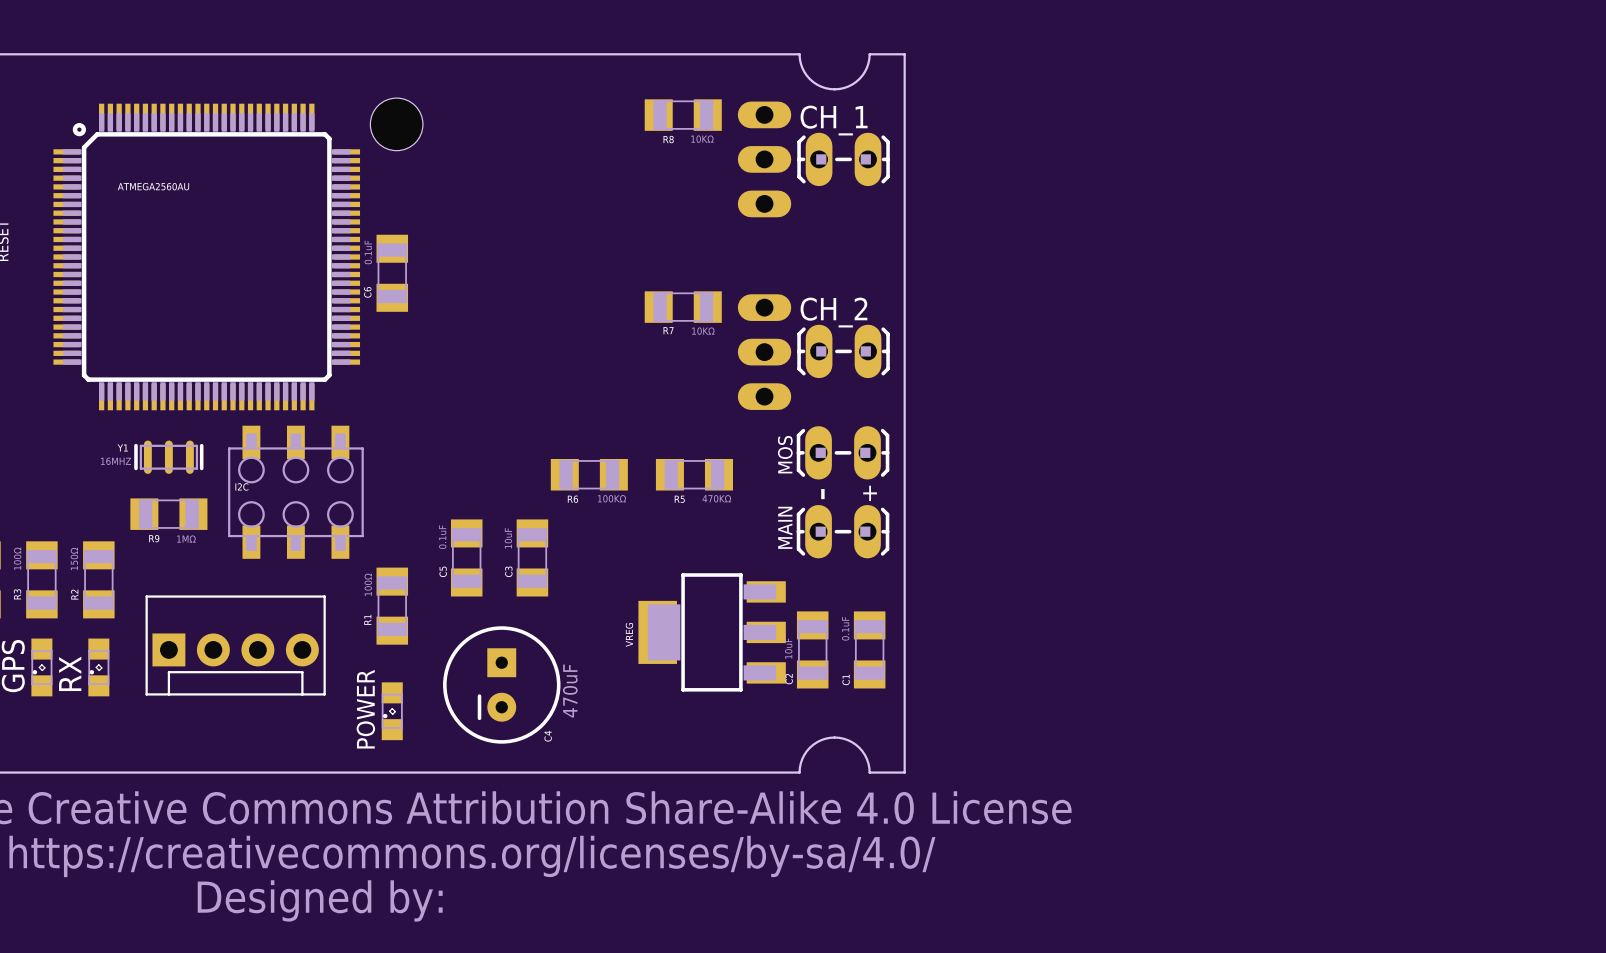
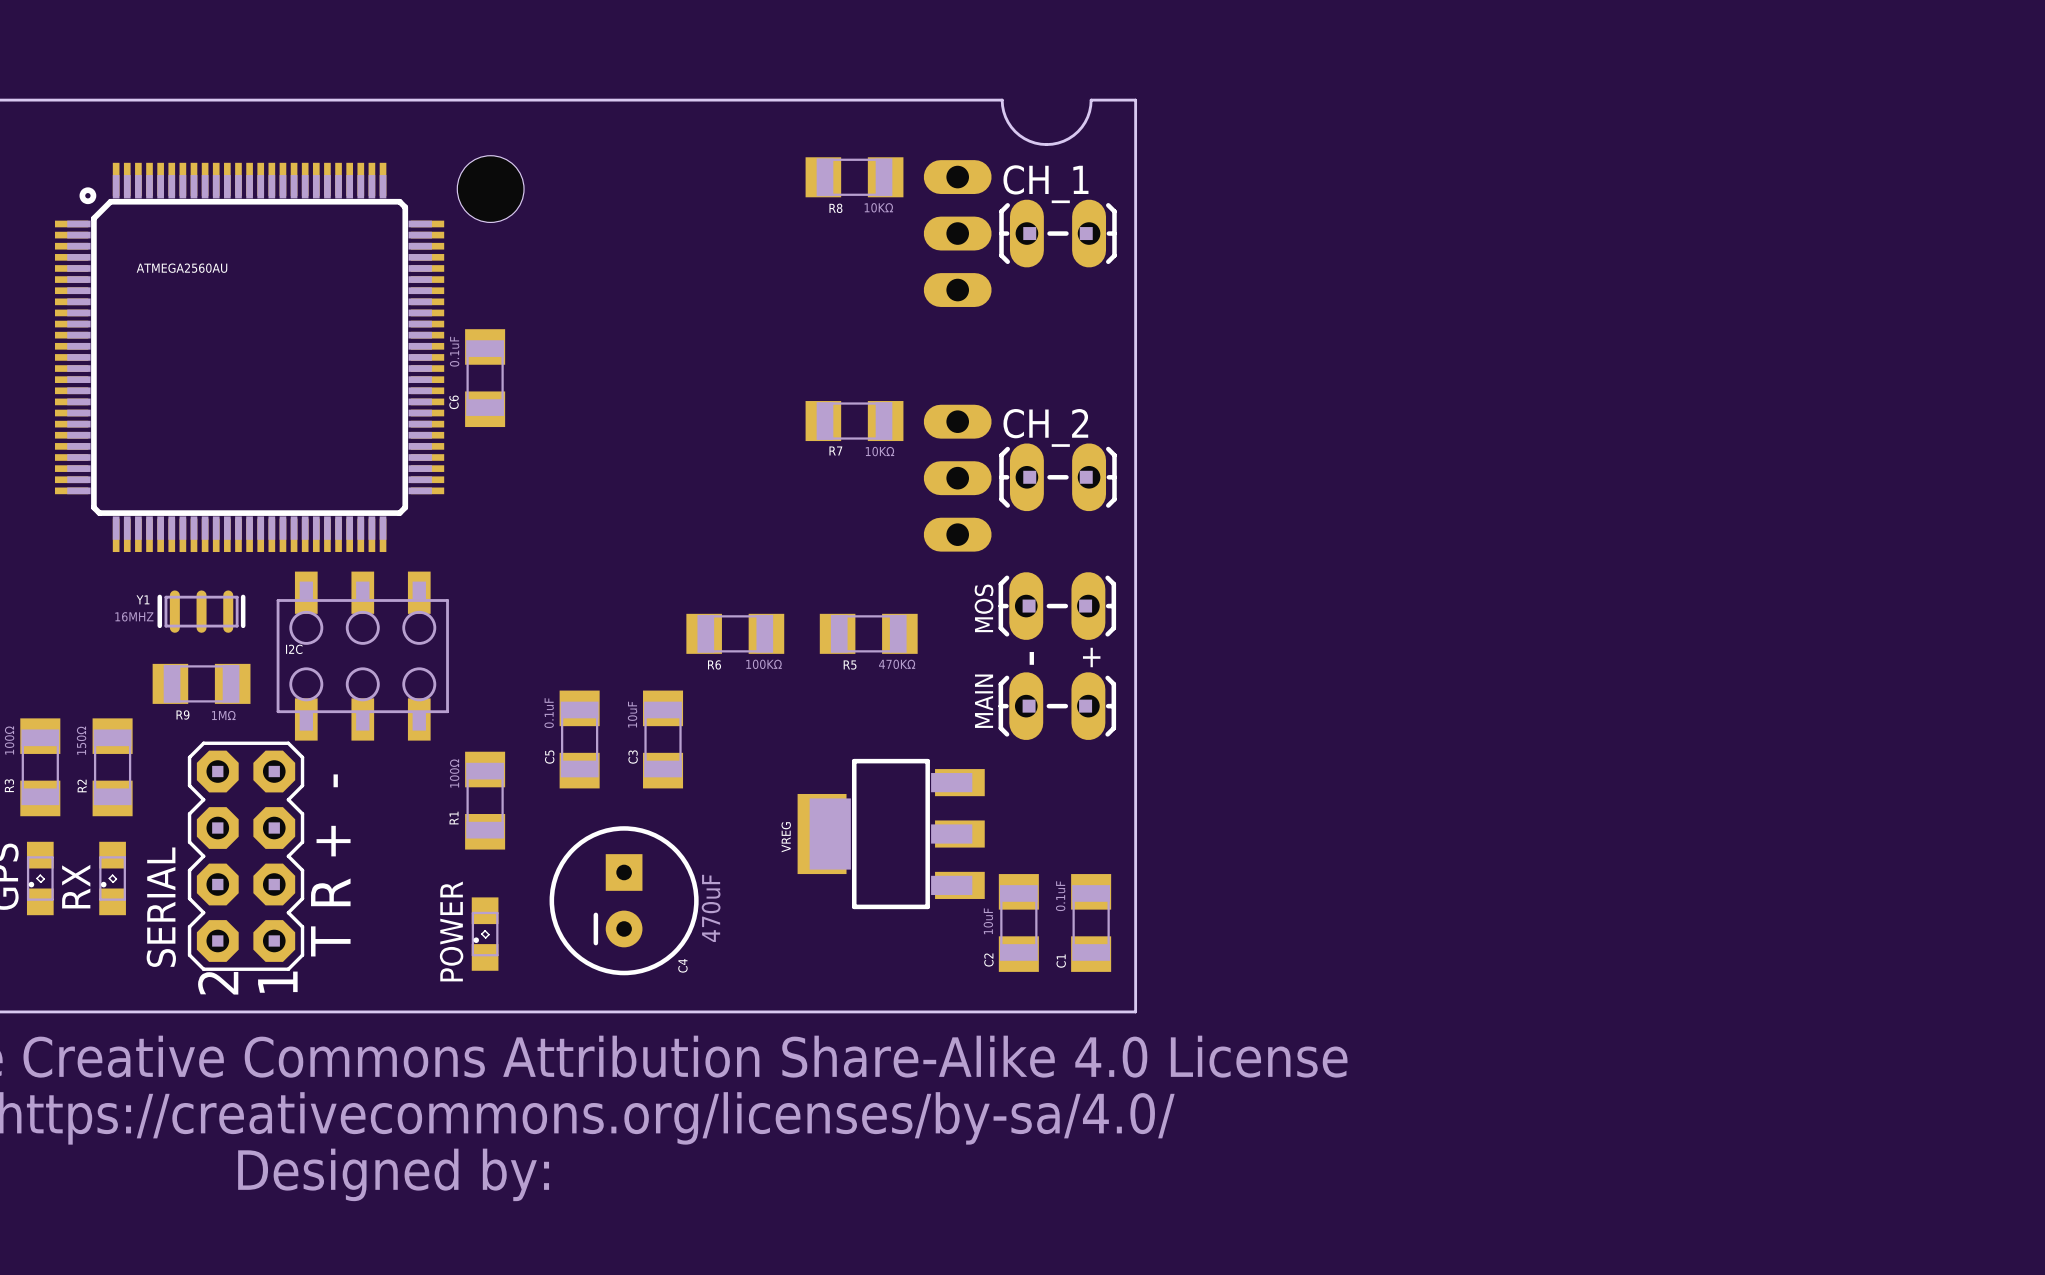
part: (235, 645) -> none
SERIAL: none -> (246, 856)
C2 position: (812, 649) -> (1018, 922)
C1 position: (869, 649) -> (1091, 922)
text: none -> T R + - (330, 865)
text: none -> 2 (218, 983)
text: none -> 1 (277, 982)
board edge: (799, 772) (802, 759) (809, 747) (821, 740) (834, 737) (848, 740) (859, 747) (866, 759) (869, 772) -> (1002, 1011) (1091, 1011)

